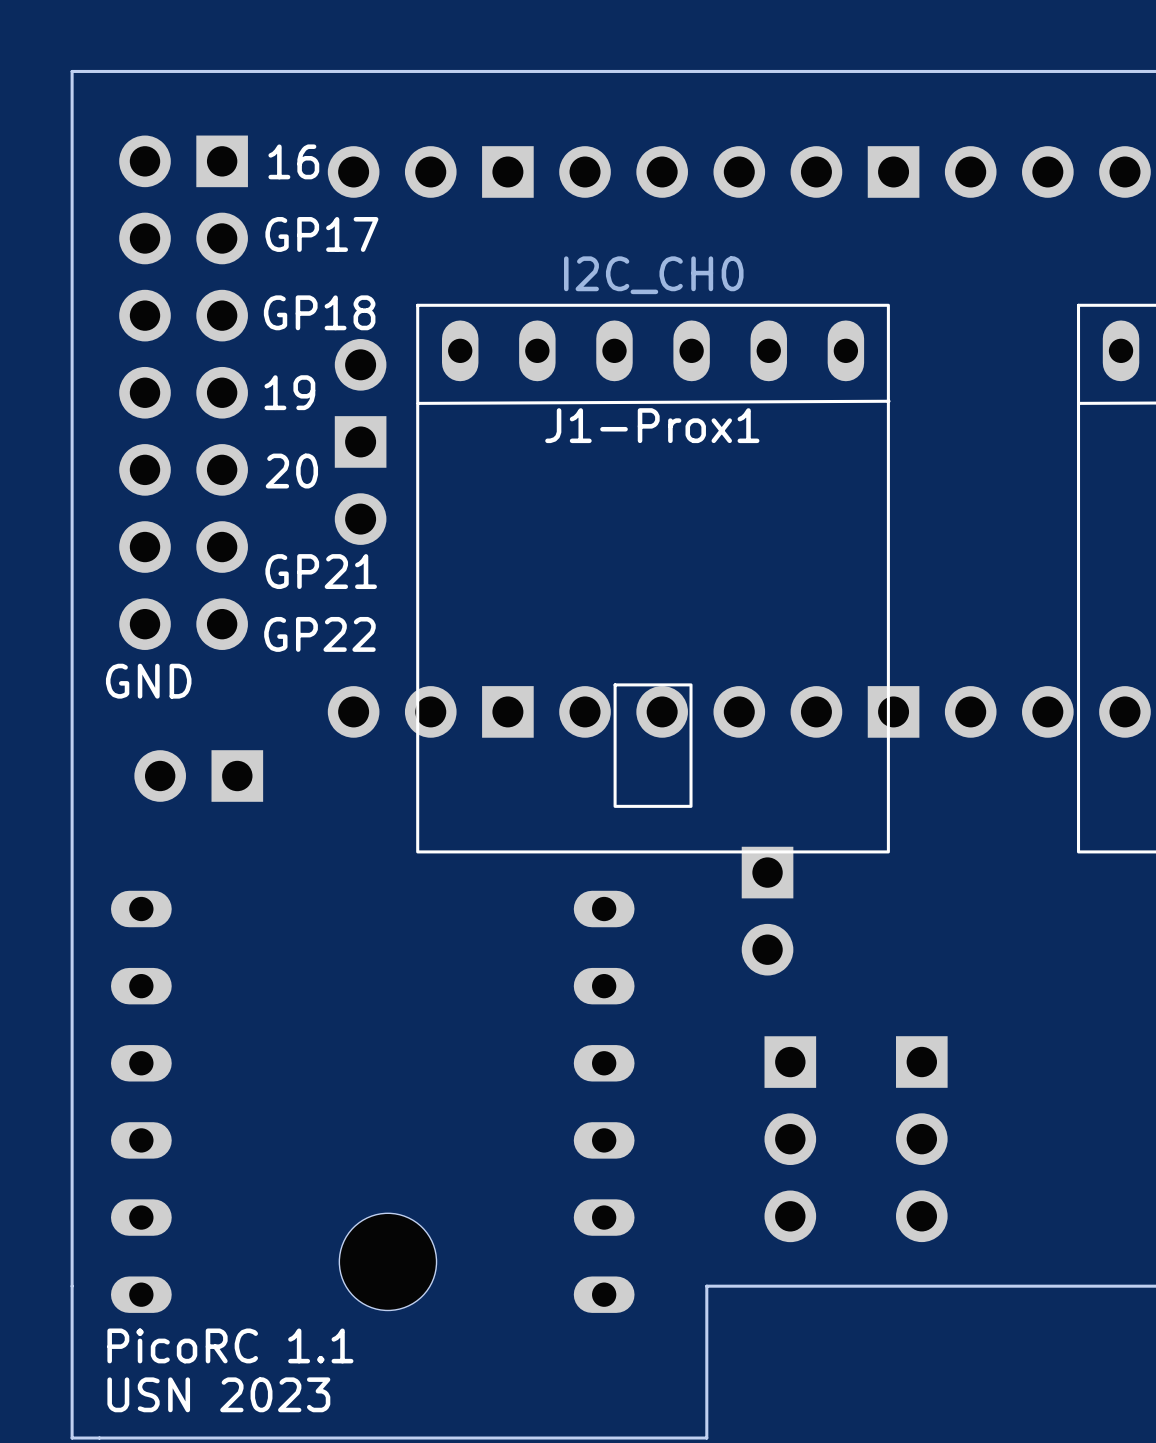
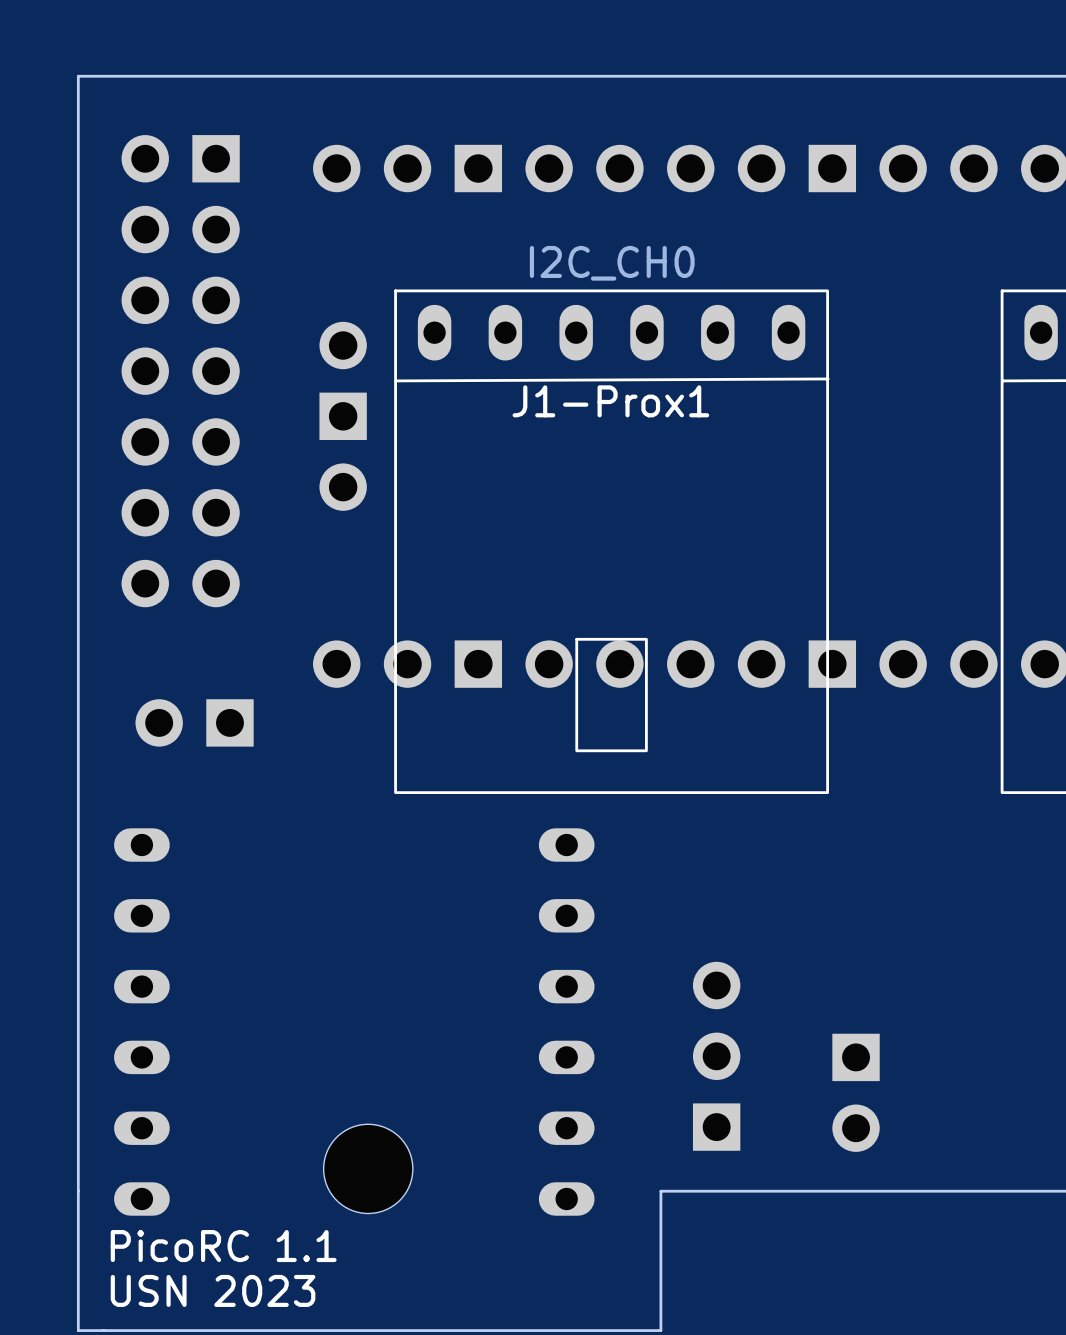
text: 16 (293, 161) -> none
text: GP17 (321, 234) -> none
text: GP18 (319, 312) -> none
text: 19 (289, 392) -> none
text: 20 (291, 471) -> none
text: GP21 (321, 571) -> none
text: GP22 (319, 634) -> none
text: GND (148, 681) -> none
part position: (767, 911) -> (856, 1092)
part rotation: 0° (790, 1139) -> 180° (716, 1056)
part: (921, 1139) -> none

